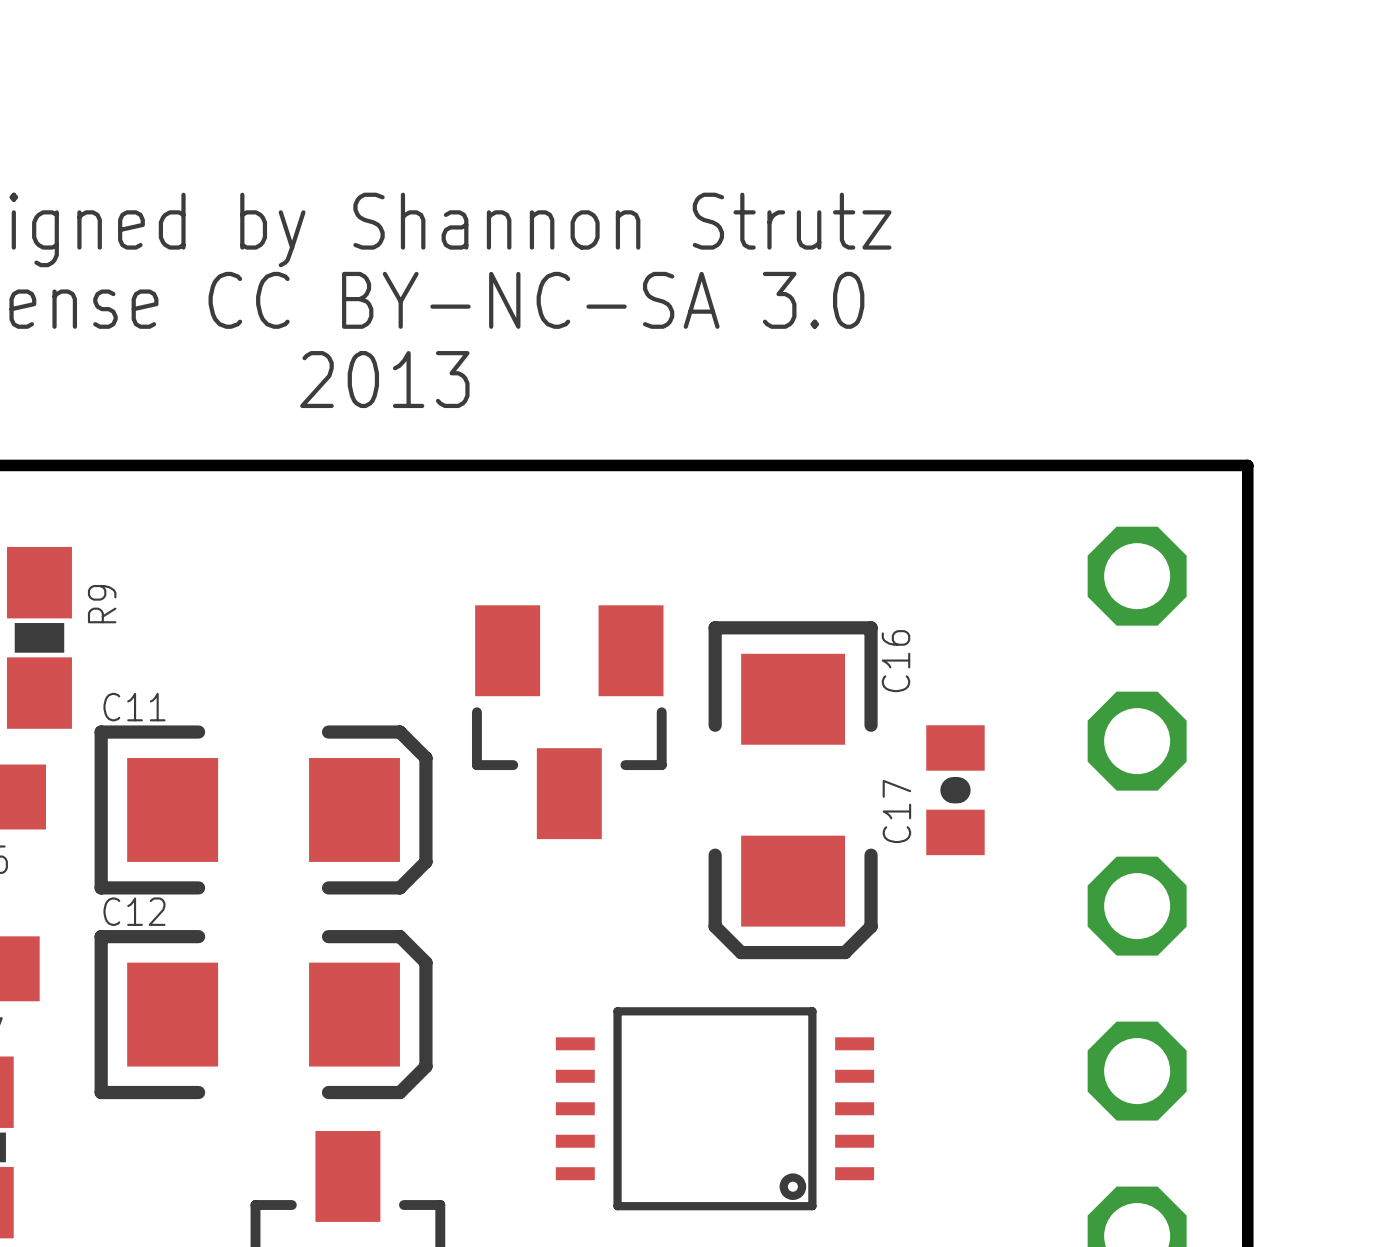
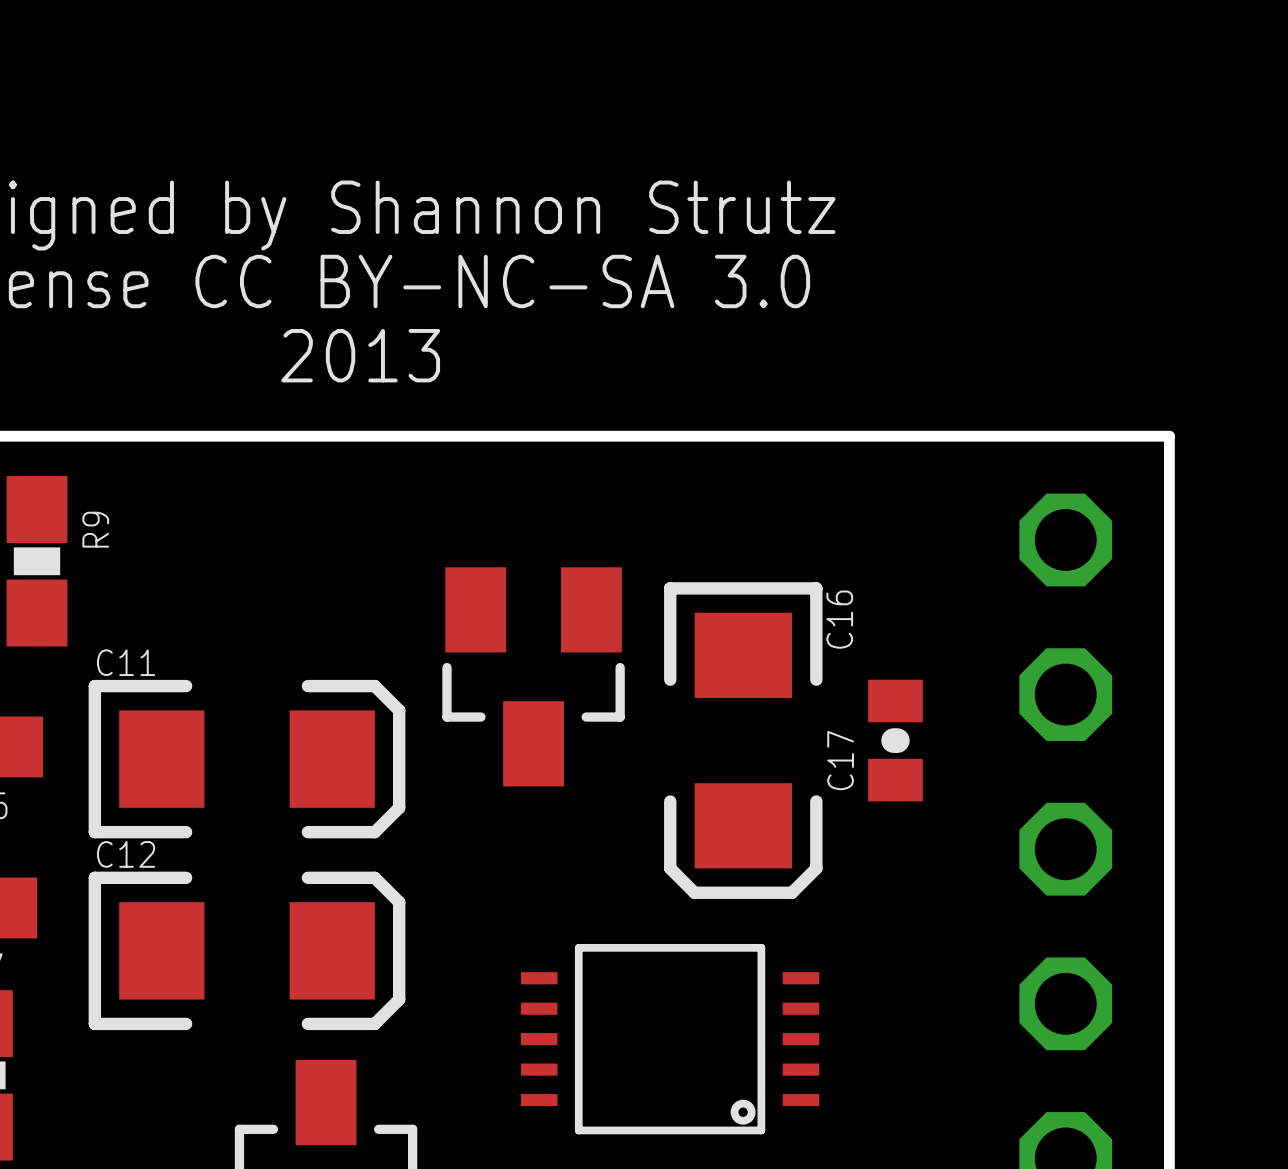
R9 position: (39, 637) -> (37, 561)

